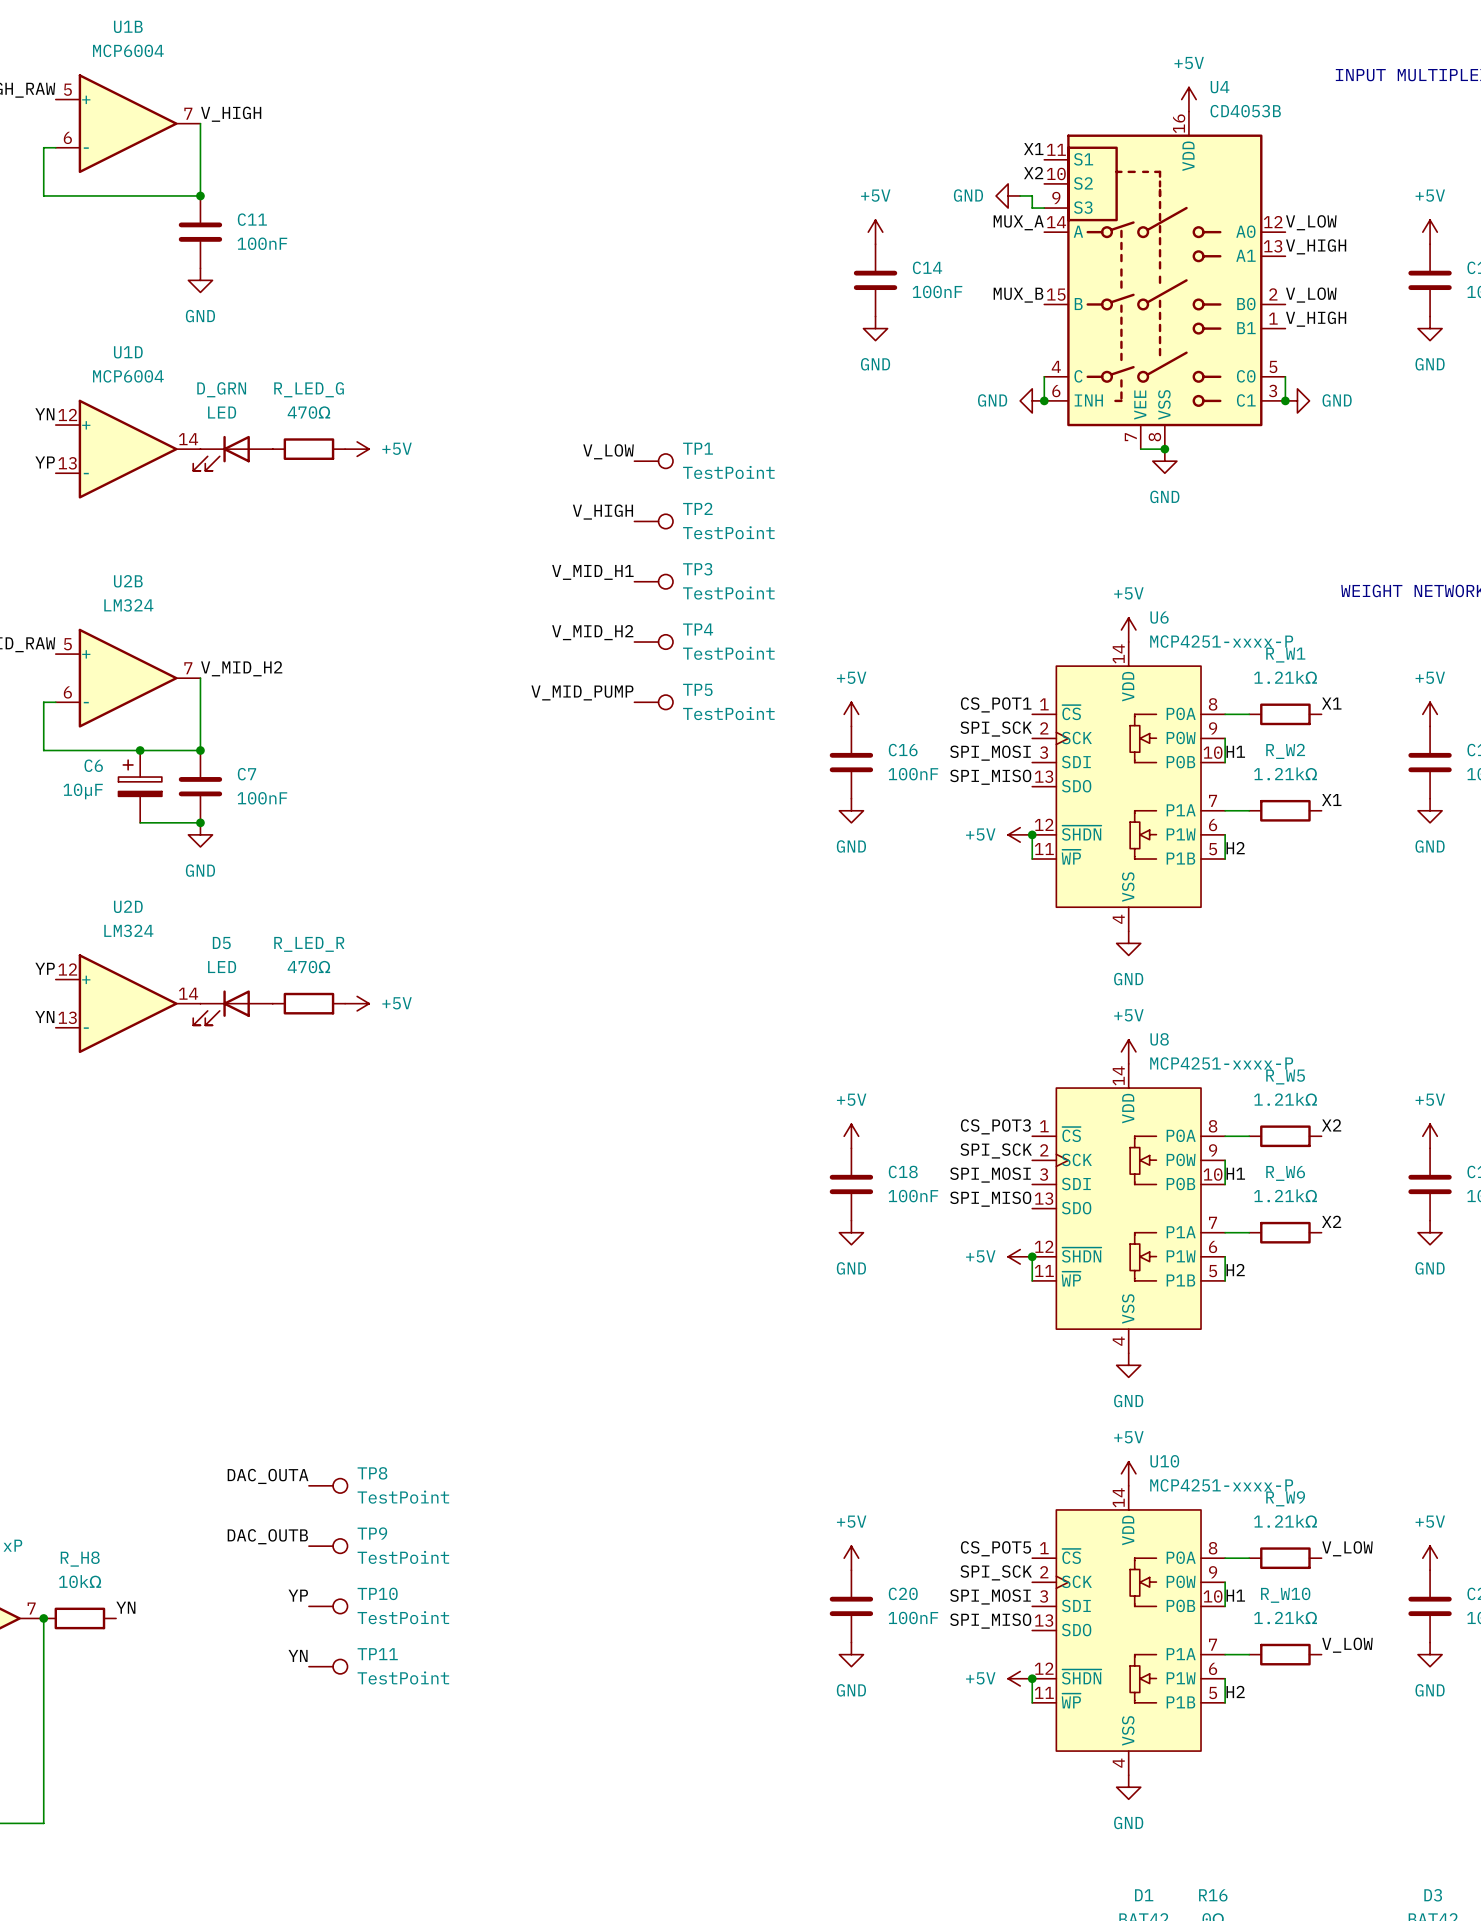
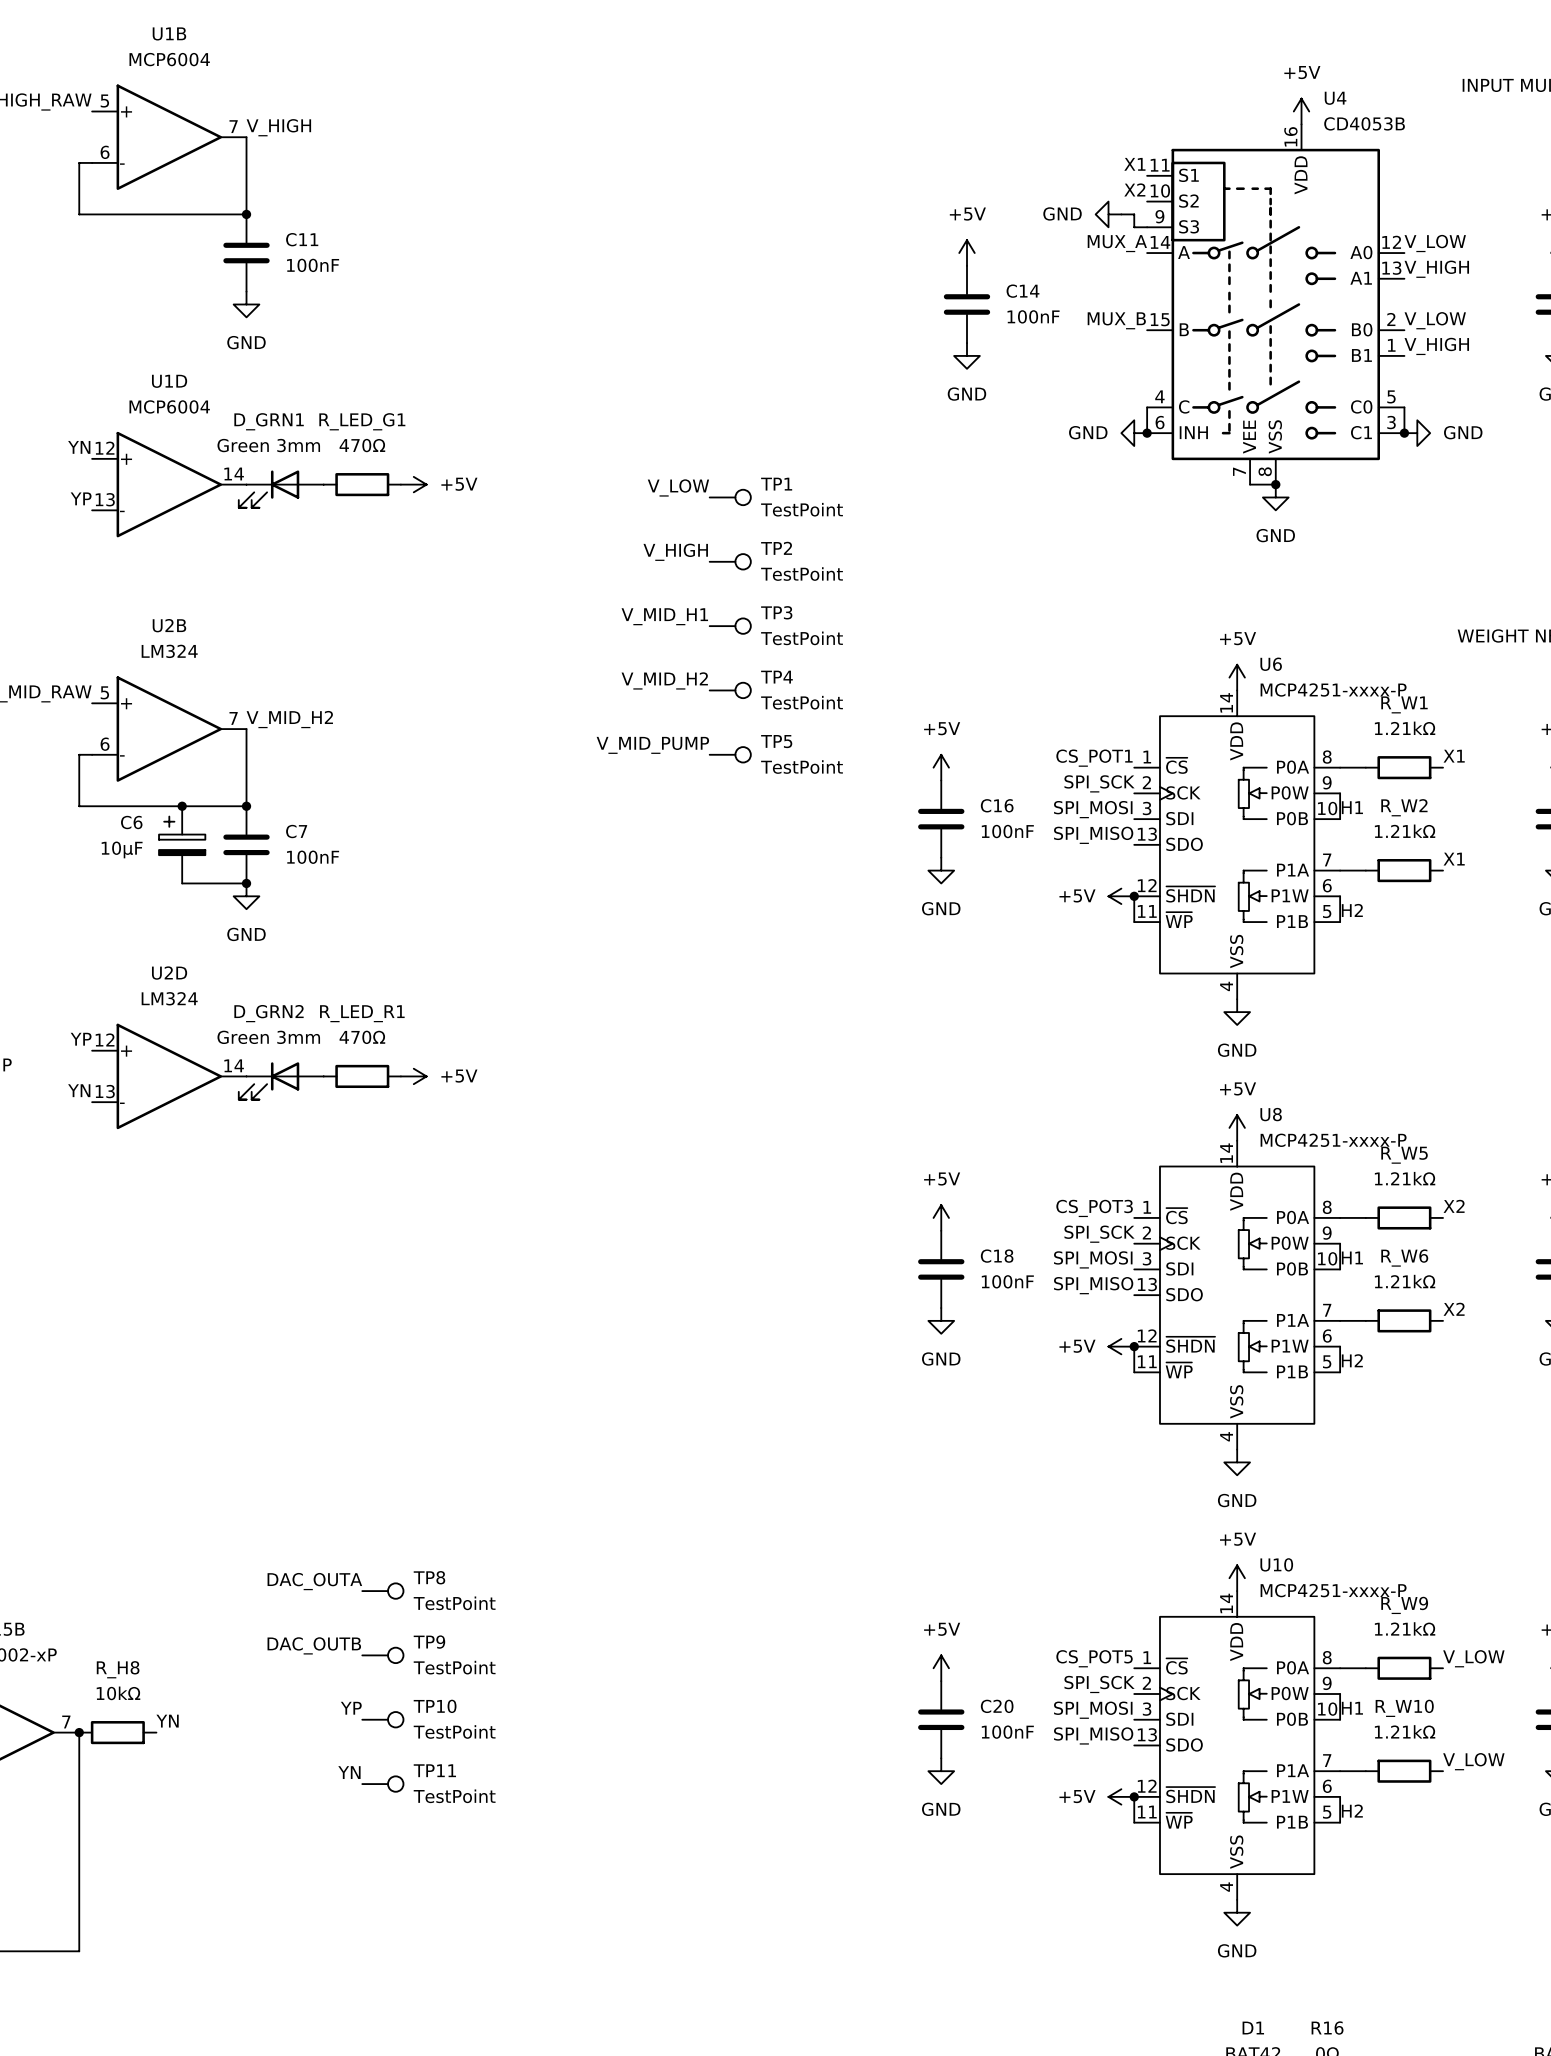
D_GRN name: D_GRN (221, 389) -> D_GRN1 (269, 421)
R_LED_G name: R_LED_G (309, 389) -> R_LED_G1 (362, 421)
D_GRN value: LED (222, 412) -> Green 3mm (268, 445)
D5 name: D5 (221, 943) -> D_GRN2 (269, 1013)
R_LED_R name: R_LED_R (309, 944) -> R_LED_R1 (362, 1013)
D5 value: LED (222, 967) -> Green 3mm (268, 1037)

